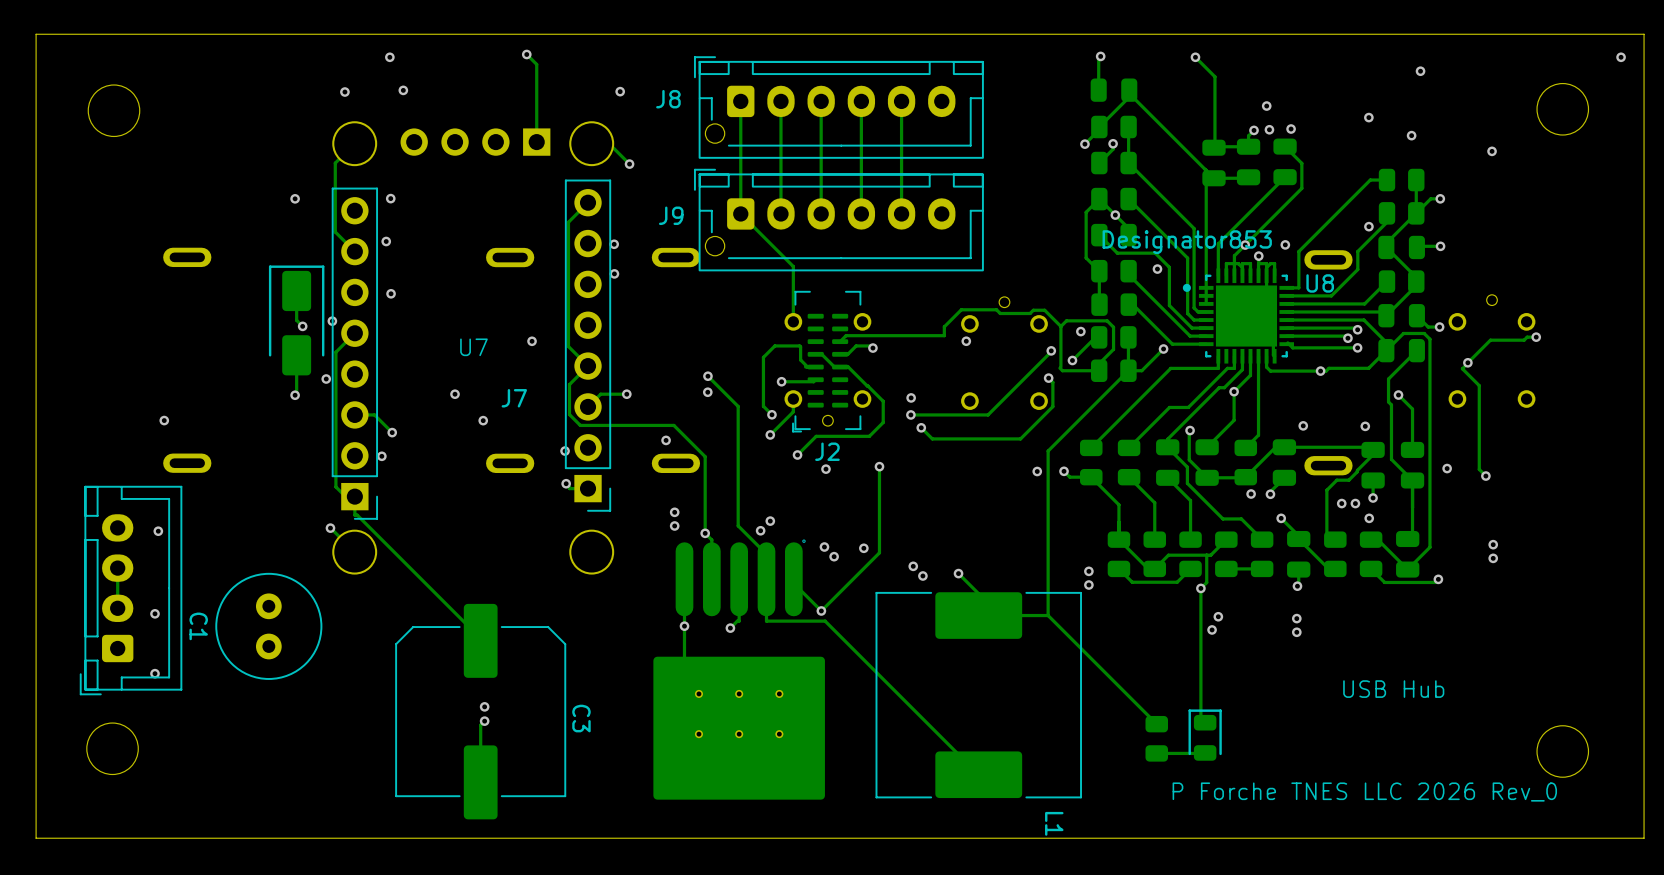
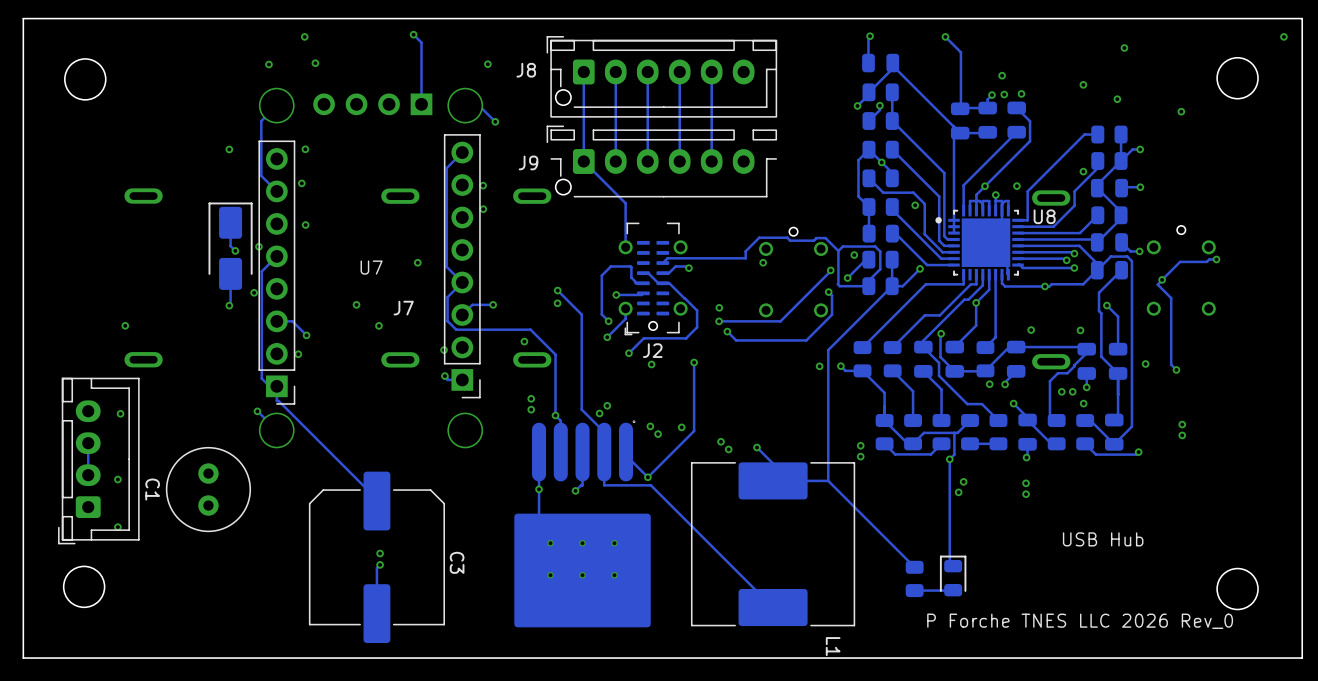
J9 footprint: [693, 168, 984, 272] -> [546, 125, 778, 198]
U8 text: Designator853 (1187, 242) -> none

